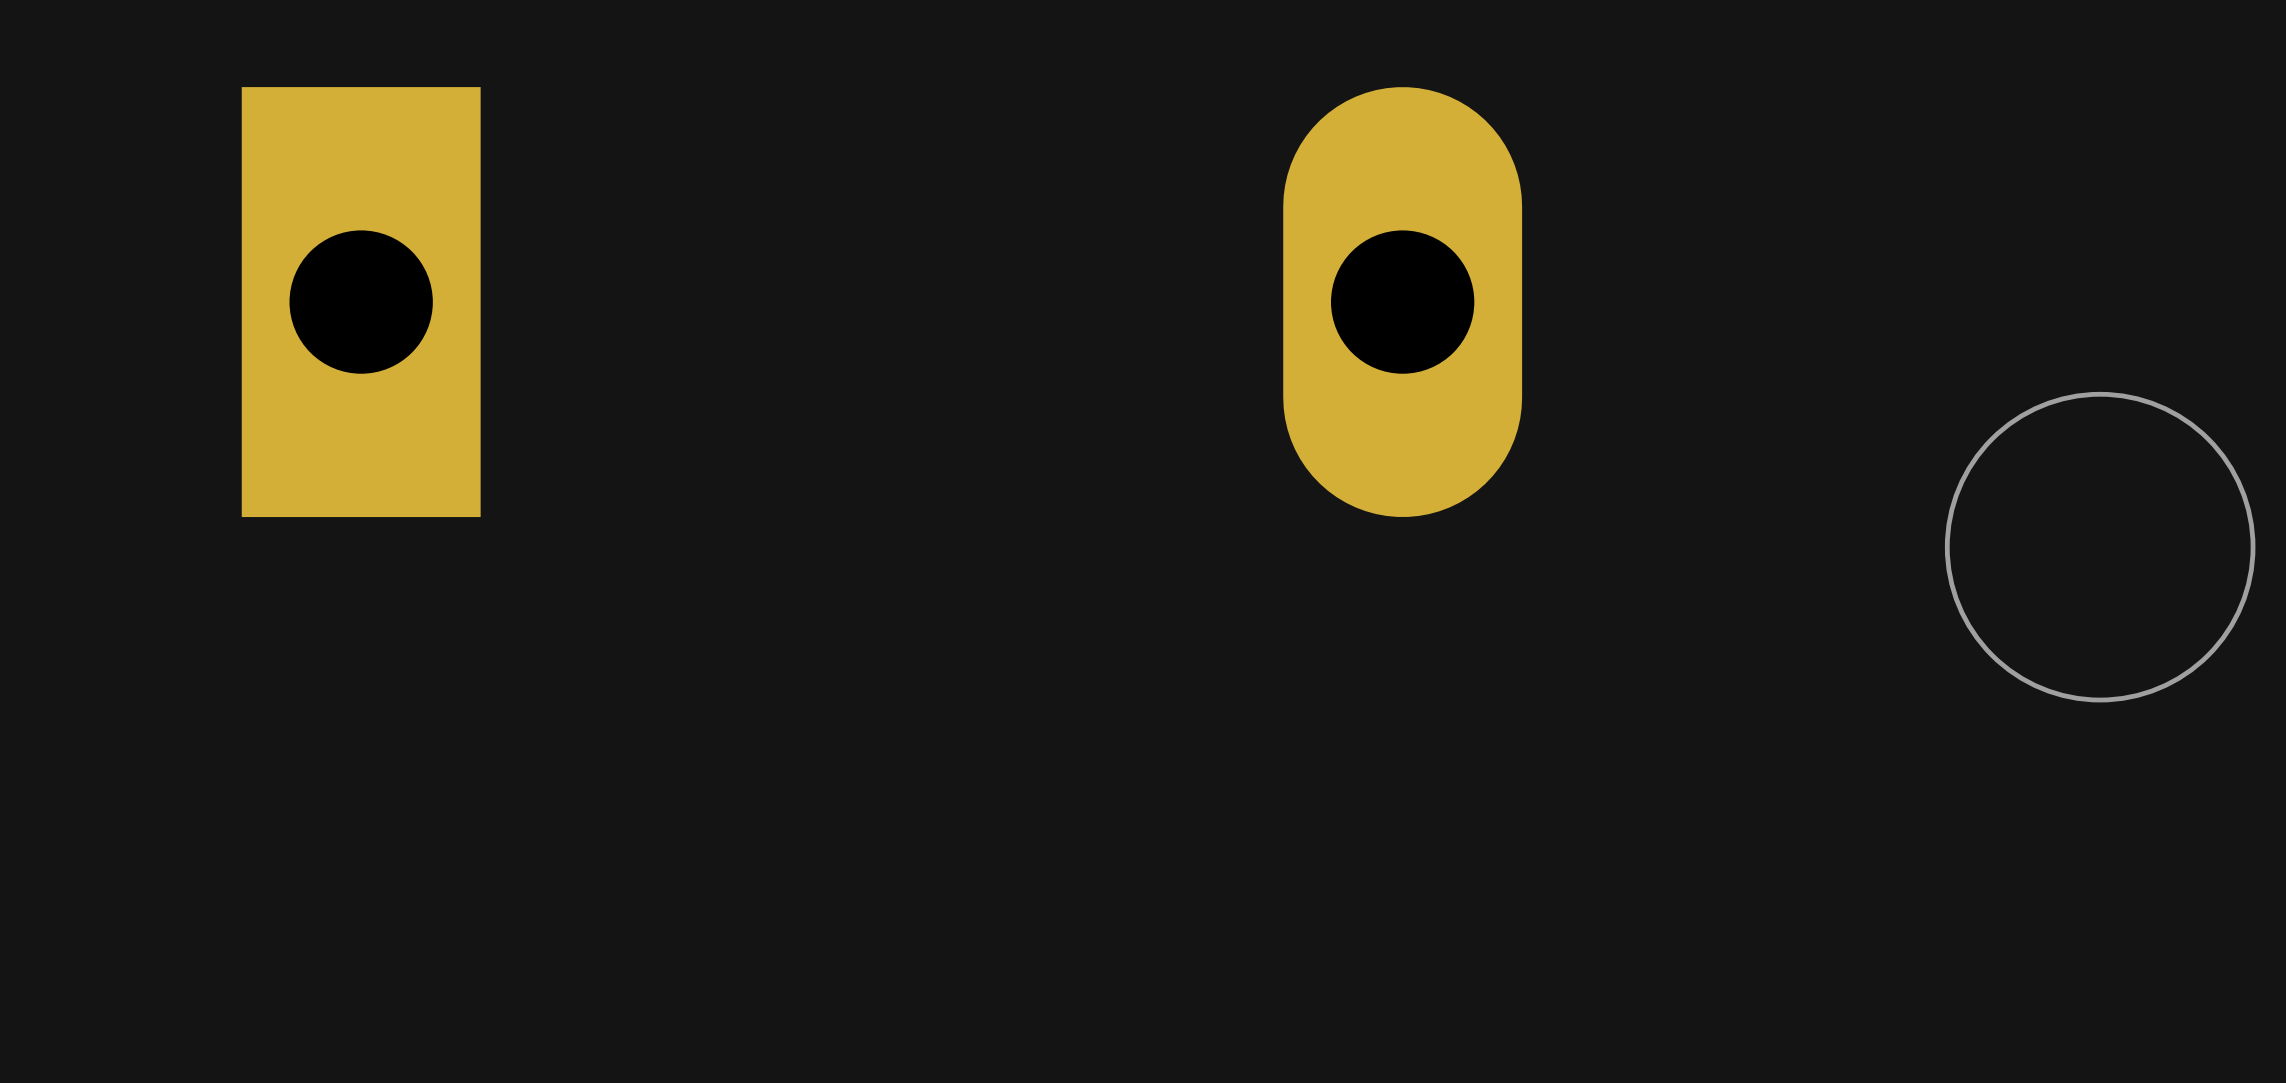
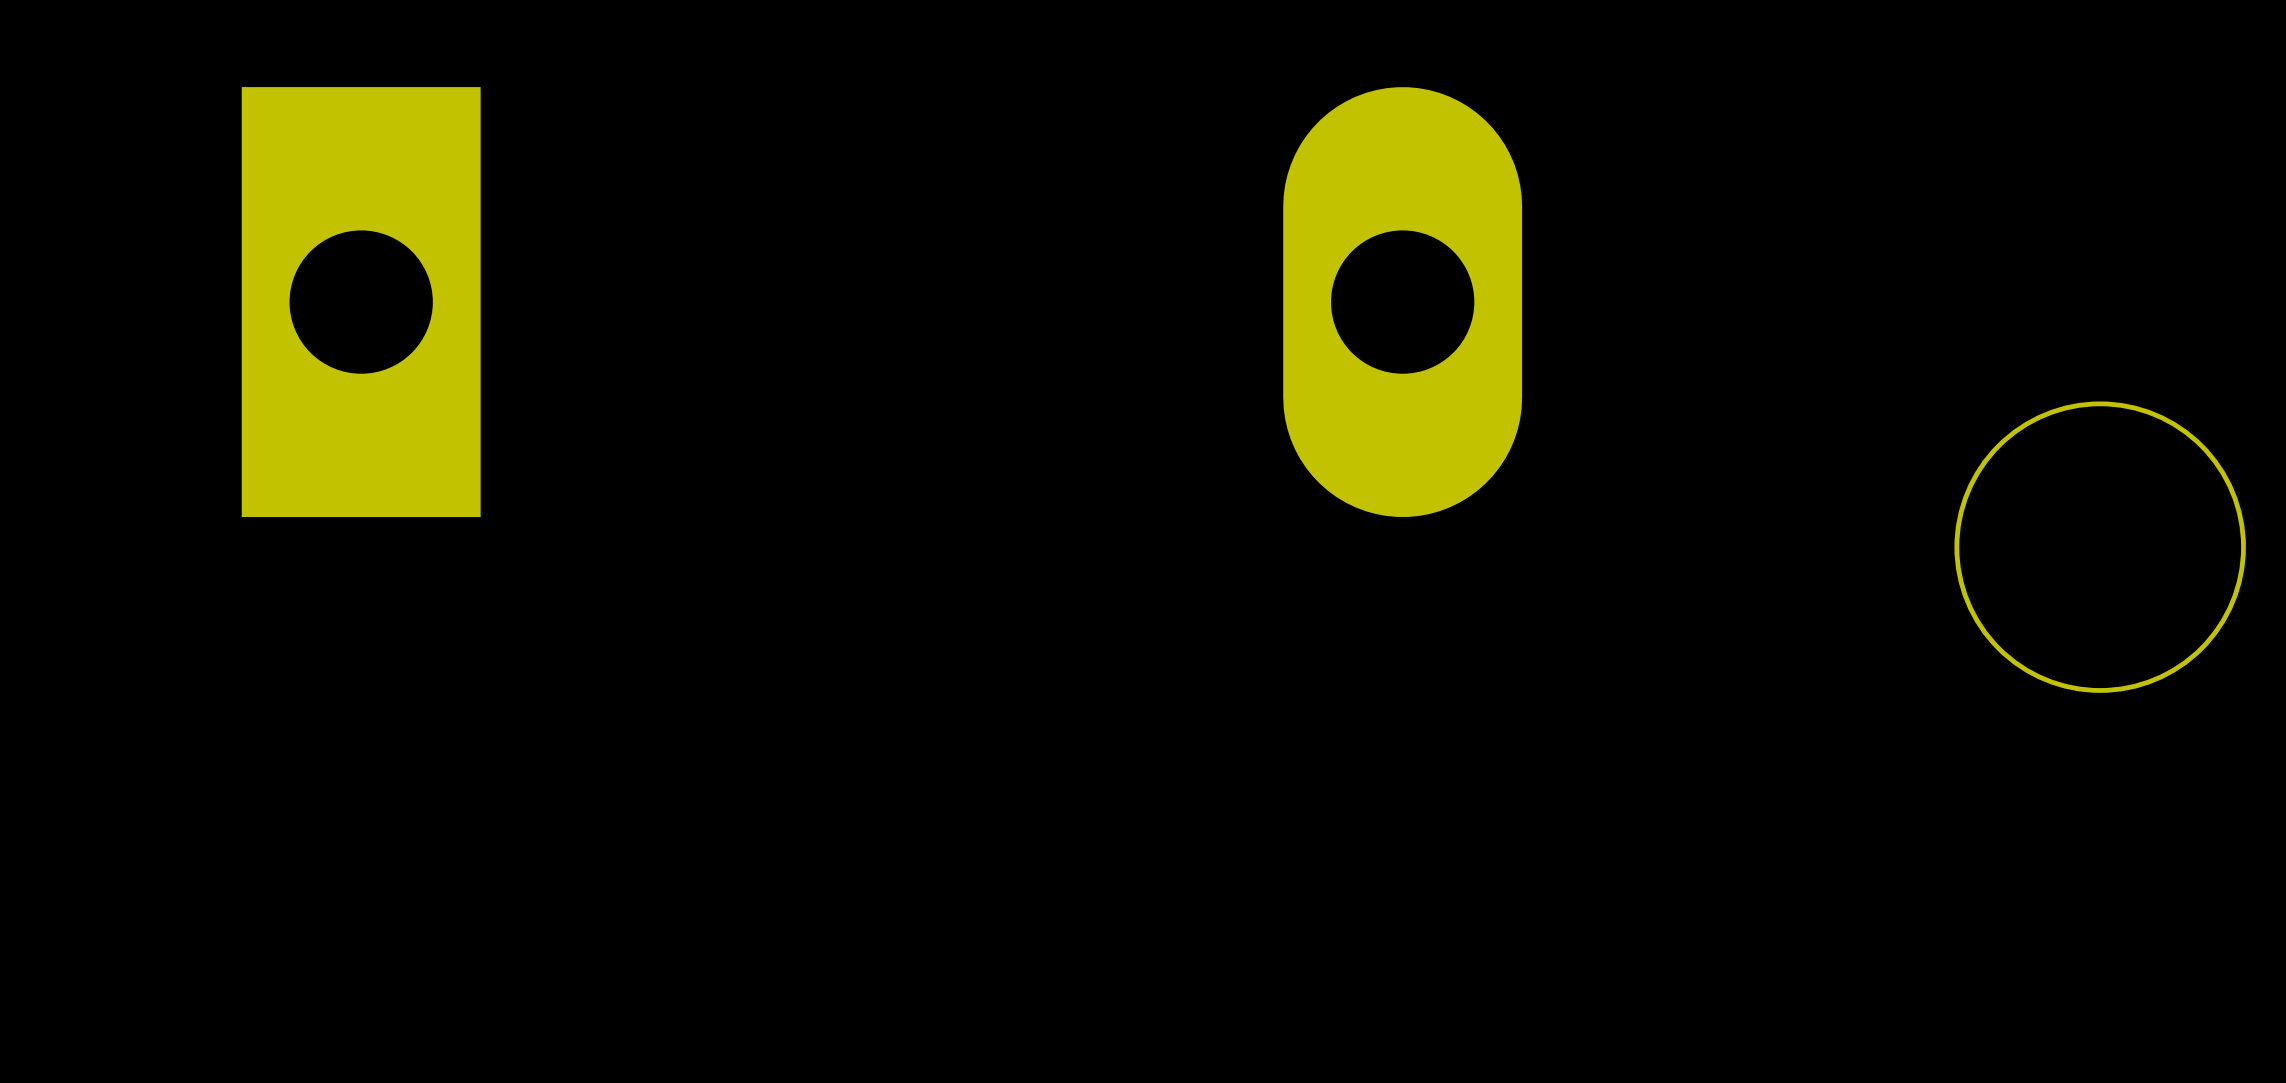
round board edge size: [1944, 391, 2256, 703] -> [1954, 401, 2246, 693]

